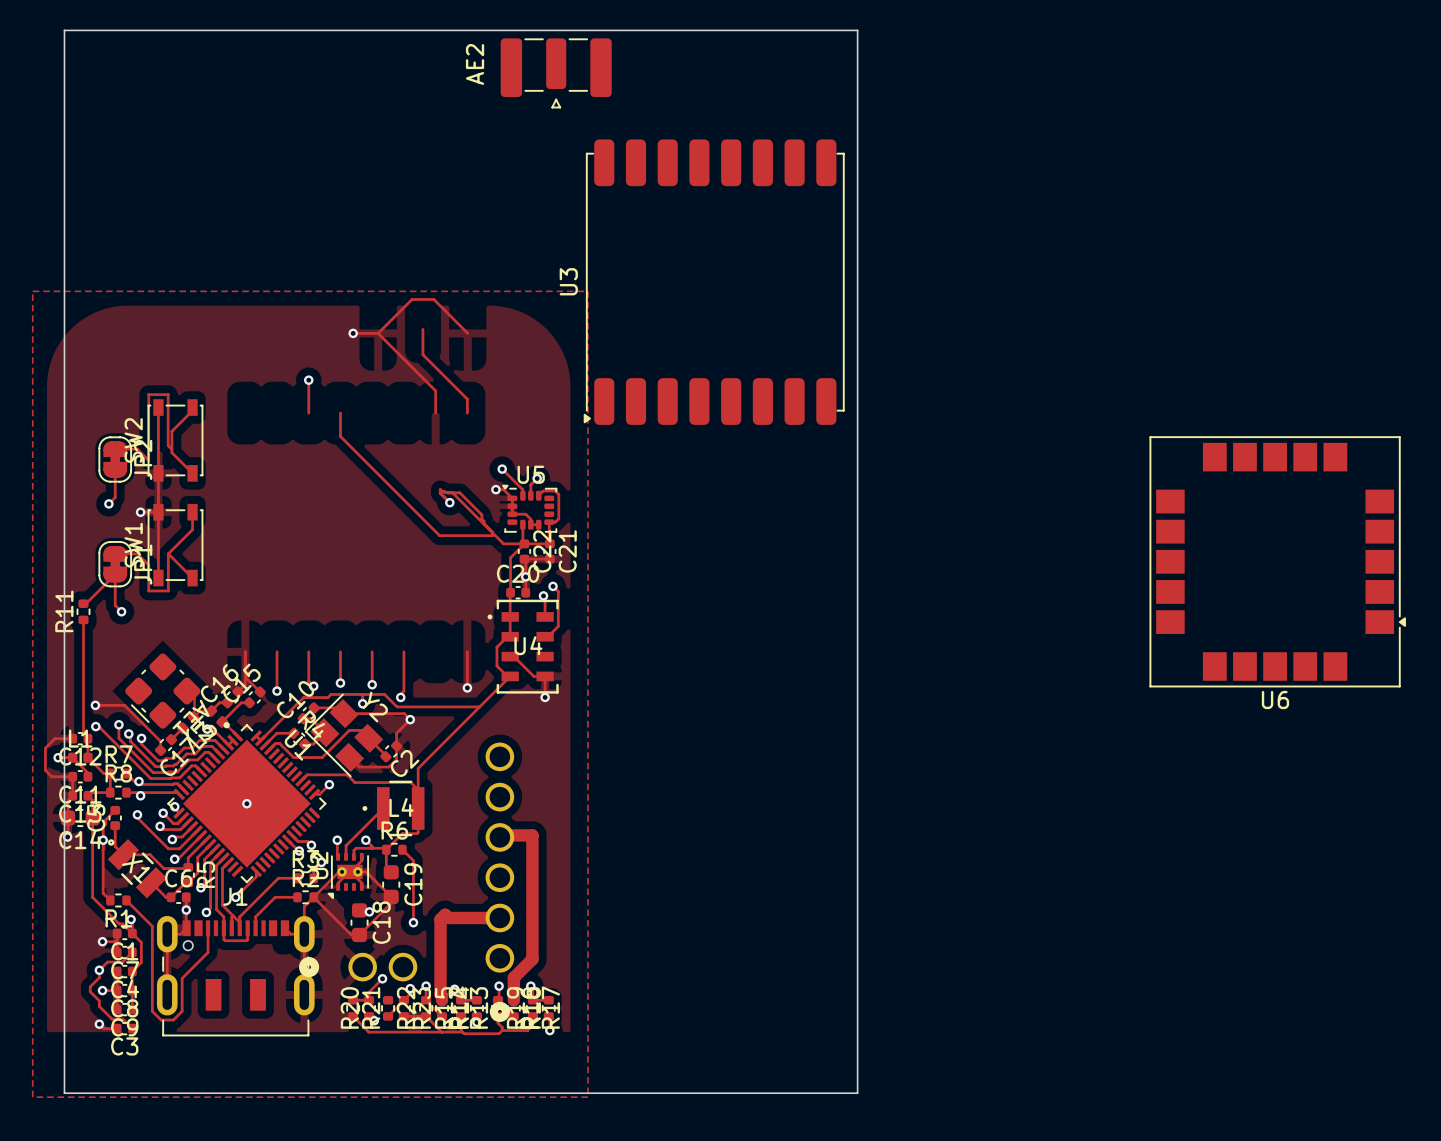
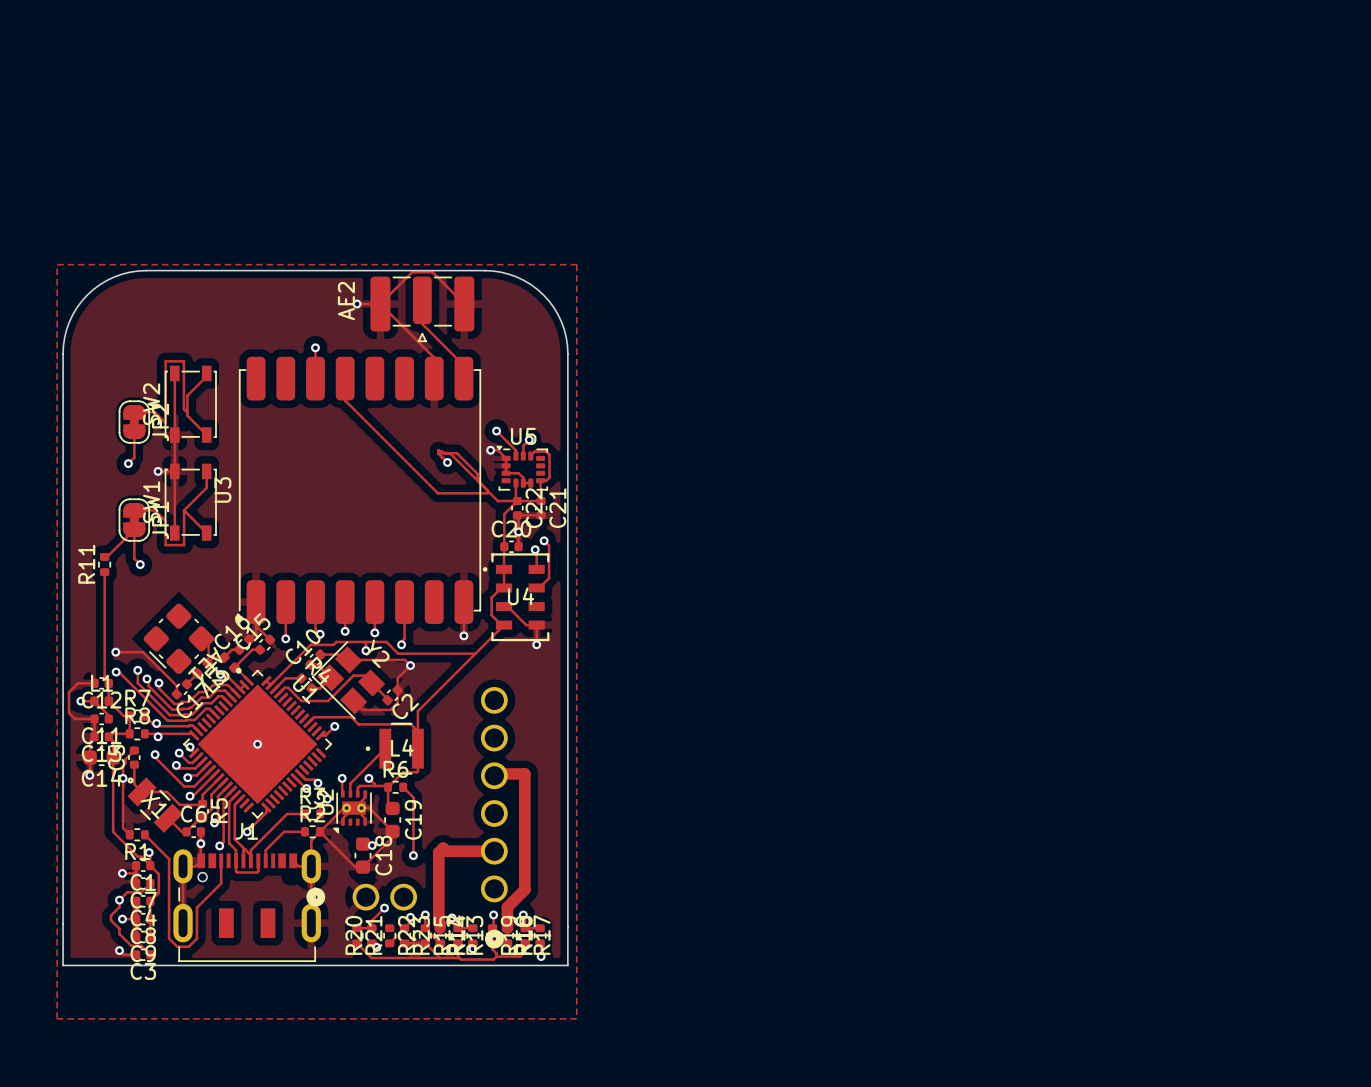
board edge: (64, 30) (857, 30) (857, 1093) (64, 1093) (64, 30) -> none
AE2 position: (556, 73) -> (422, 309)
U3 position: (714, 282) -> (359, 490)
board edge: none -> (146, 270) (492, 271) (508, 274) (523, 280) (537, 289) (553, 307) (564, 329) (567, 353) (567, 965) (63, 965) (63, 345) (66, 329) (72, 314) (81, 301) (93, 289) (107, 280) (122, 274) (146, 270)
U6: (1277, 561) -> none

